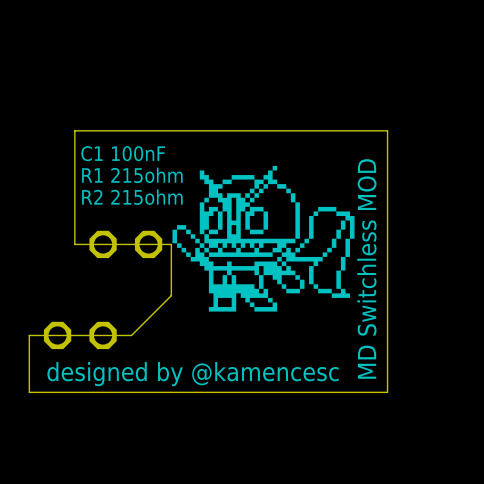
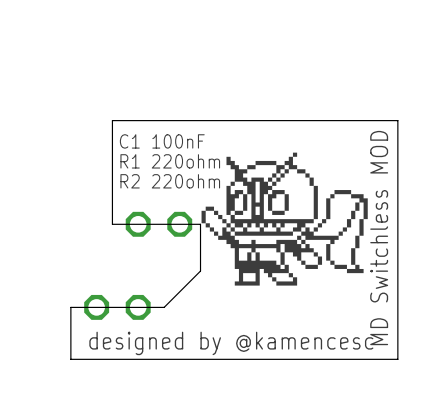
text: R1 215ohm (132, 175) -> R1 220ohm (170, 161)
text: R2 215ohm (132, 197) -> R2 220ohm (170, 181)

